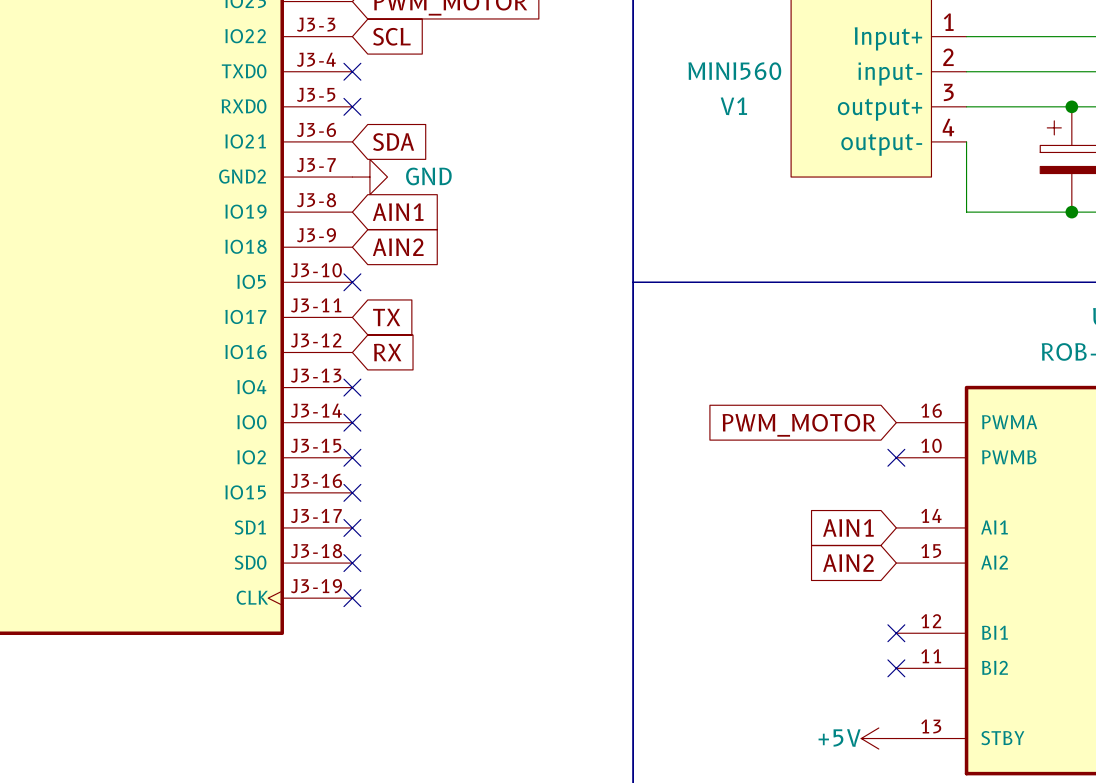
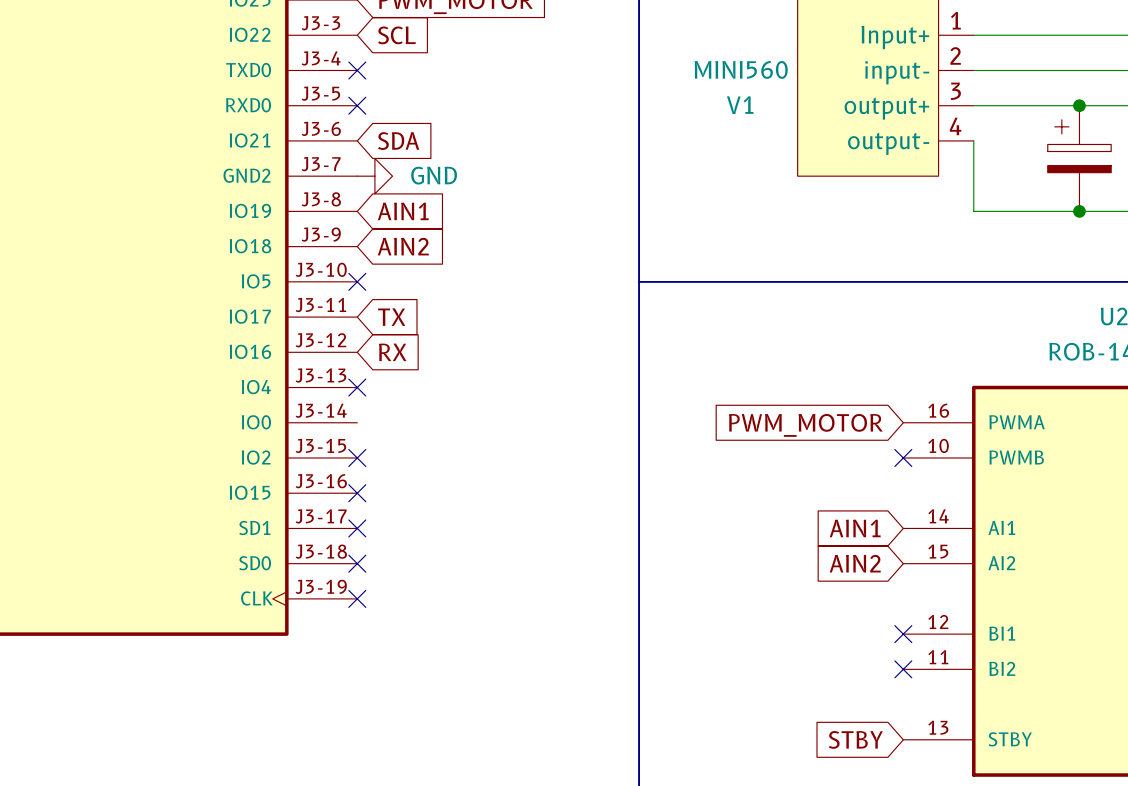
no-connect mark: (352, 422) -> none
global label: none -> STBY (855, 739)
power symbol: +5V (878, 738) -> none

